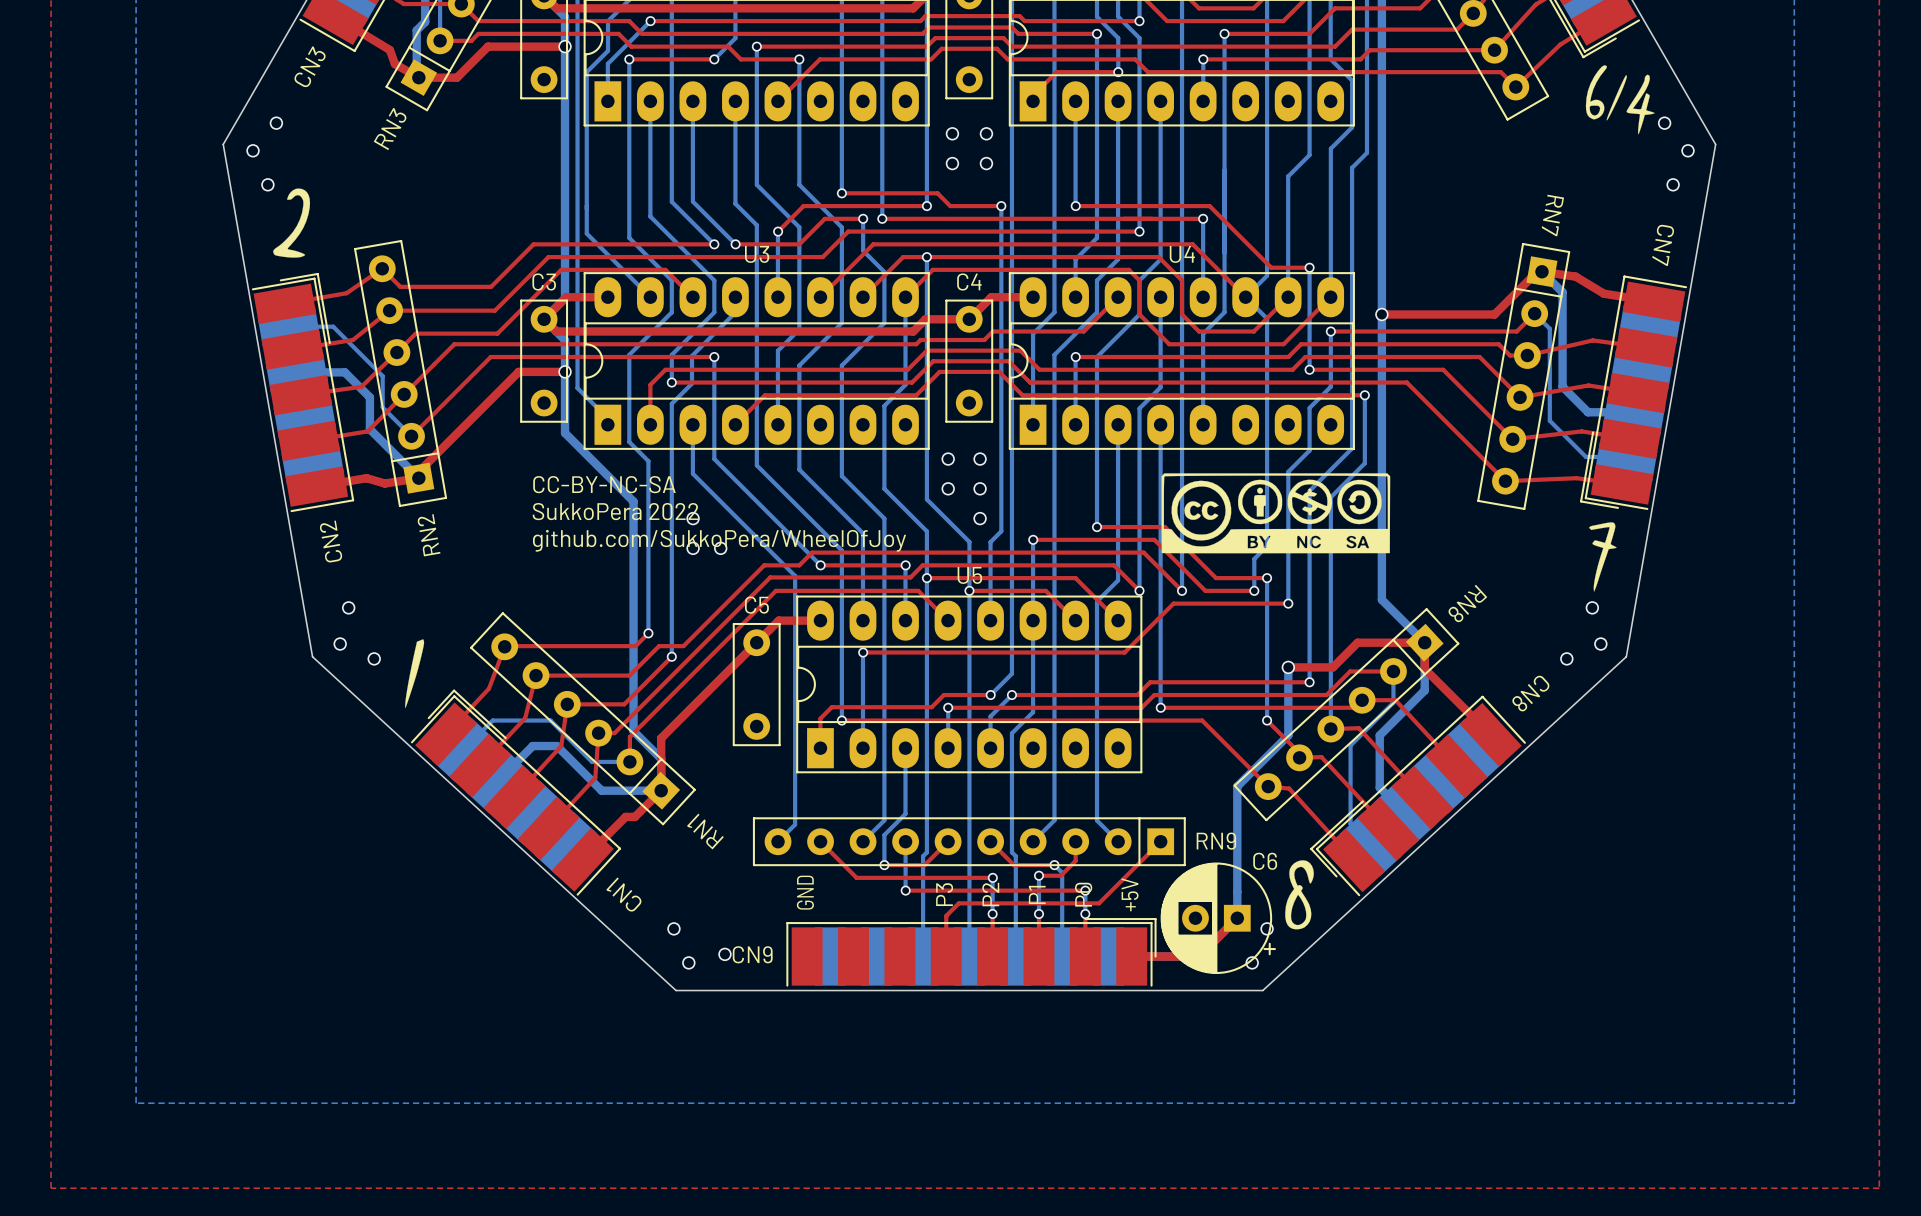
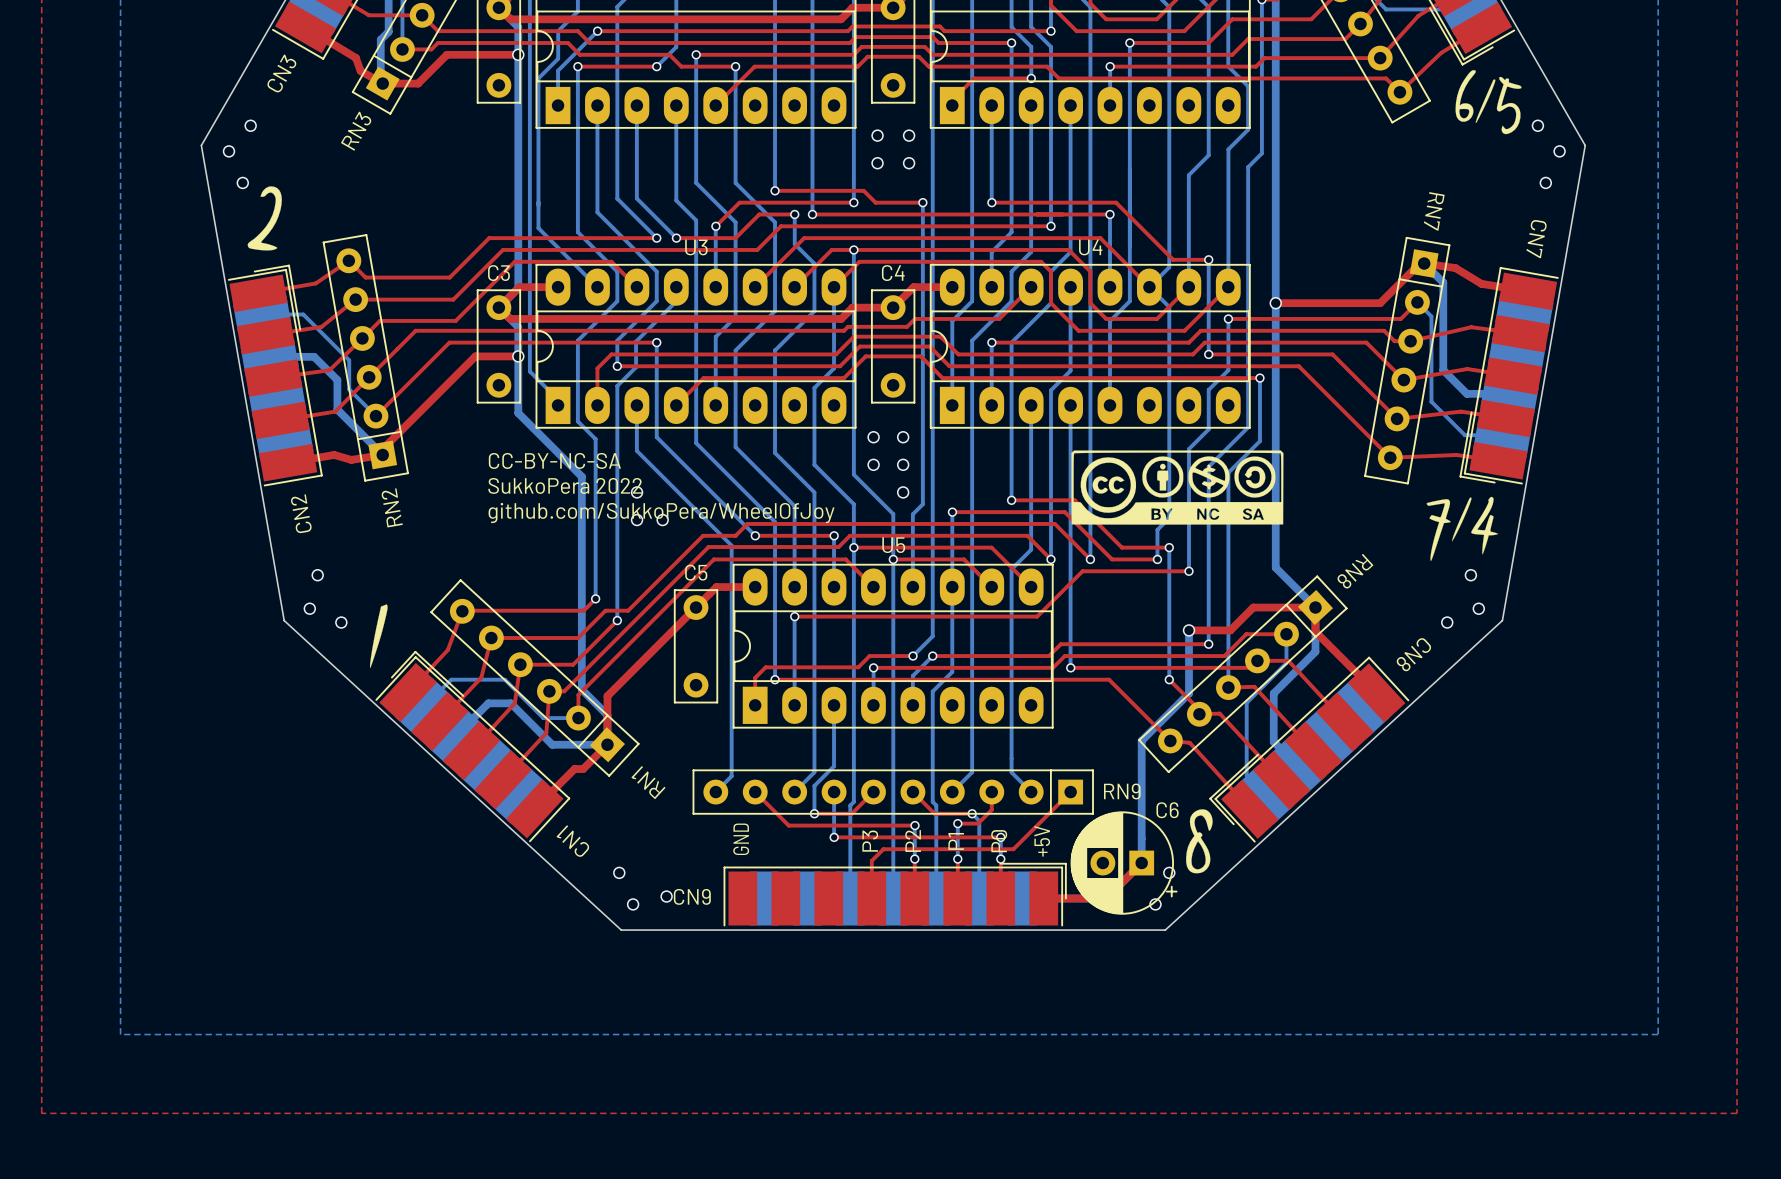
drawing shape: [1585, 65, 1655, 135] -> [1455, 70, 1522, 135]
drawing: [1589, 522, 1617, 592] -> none
drawing: none -> [1426, 496, 1499, 562]

